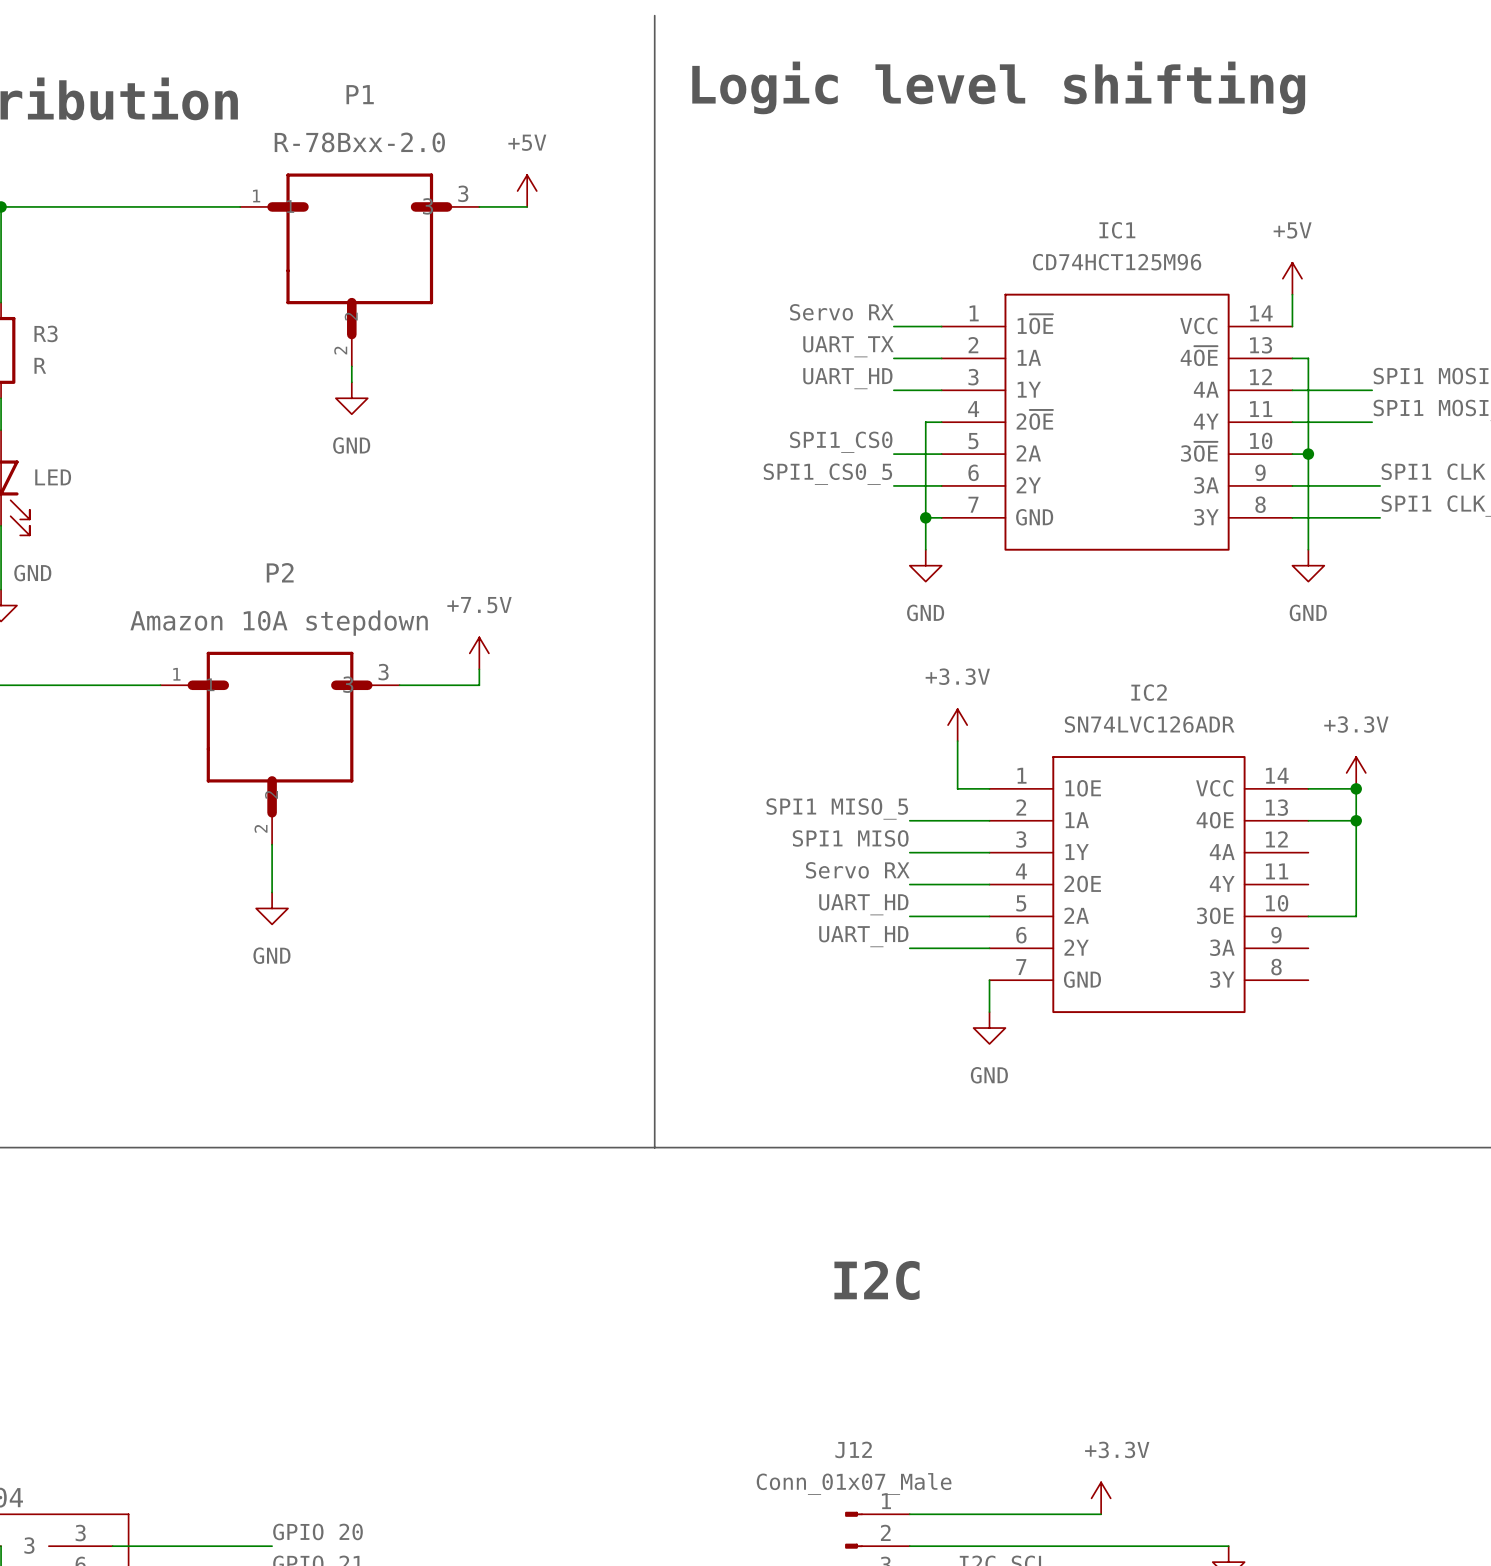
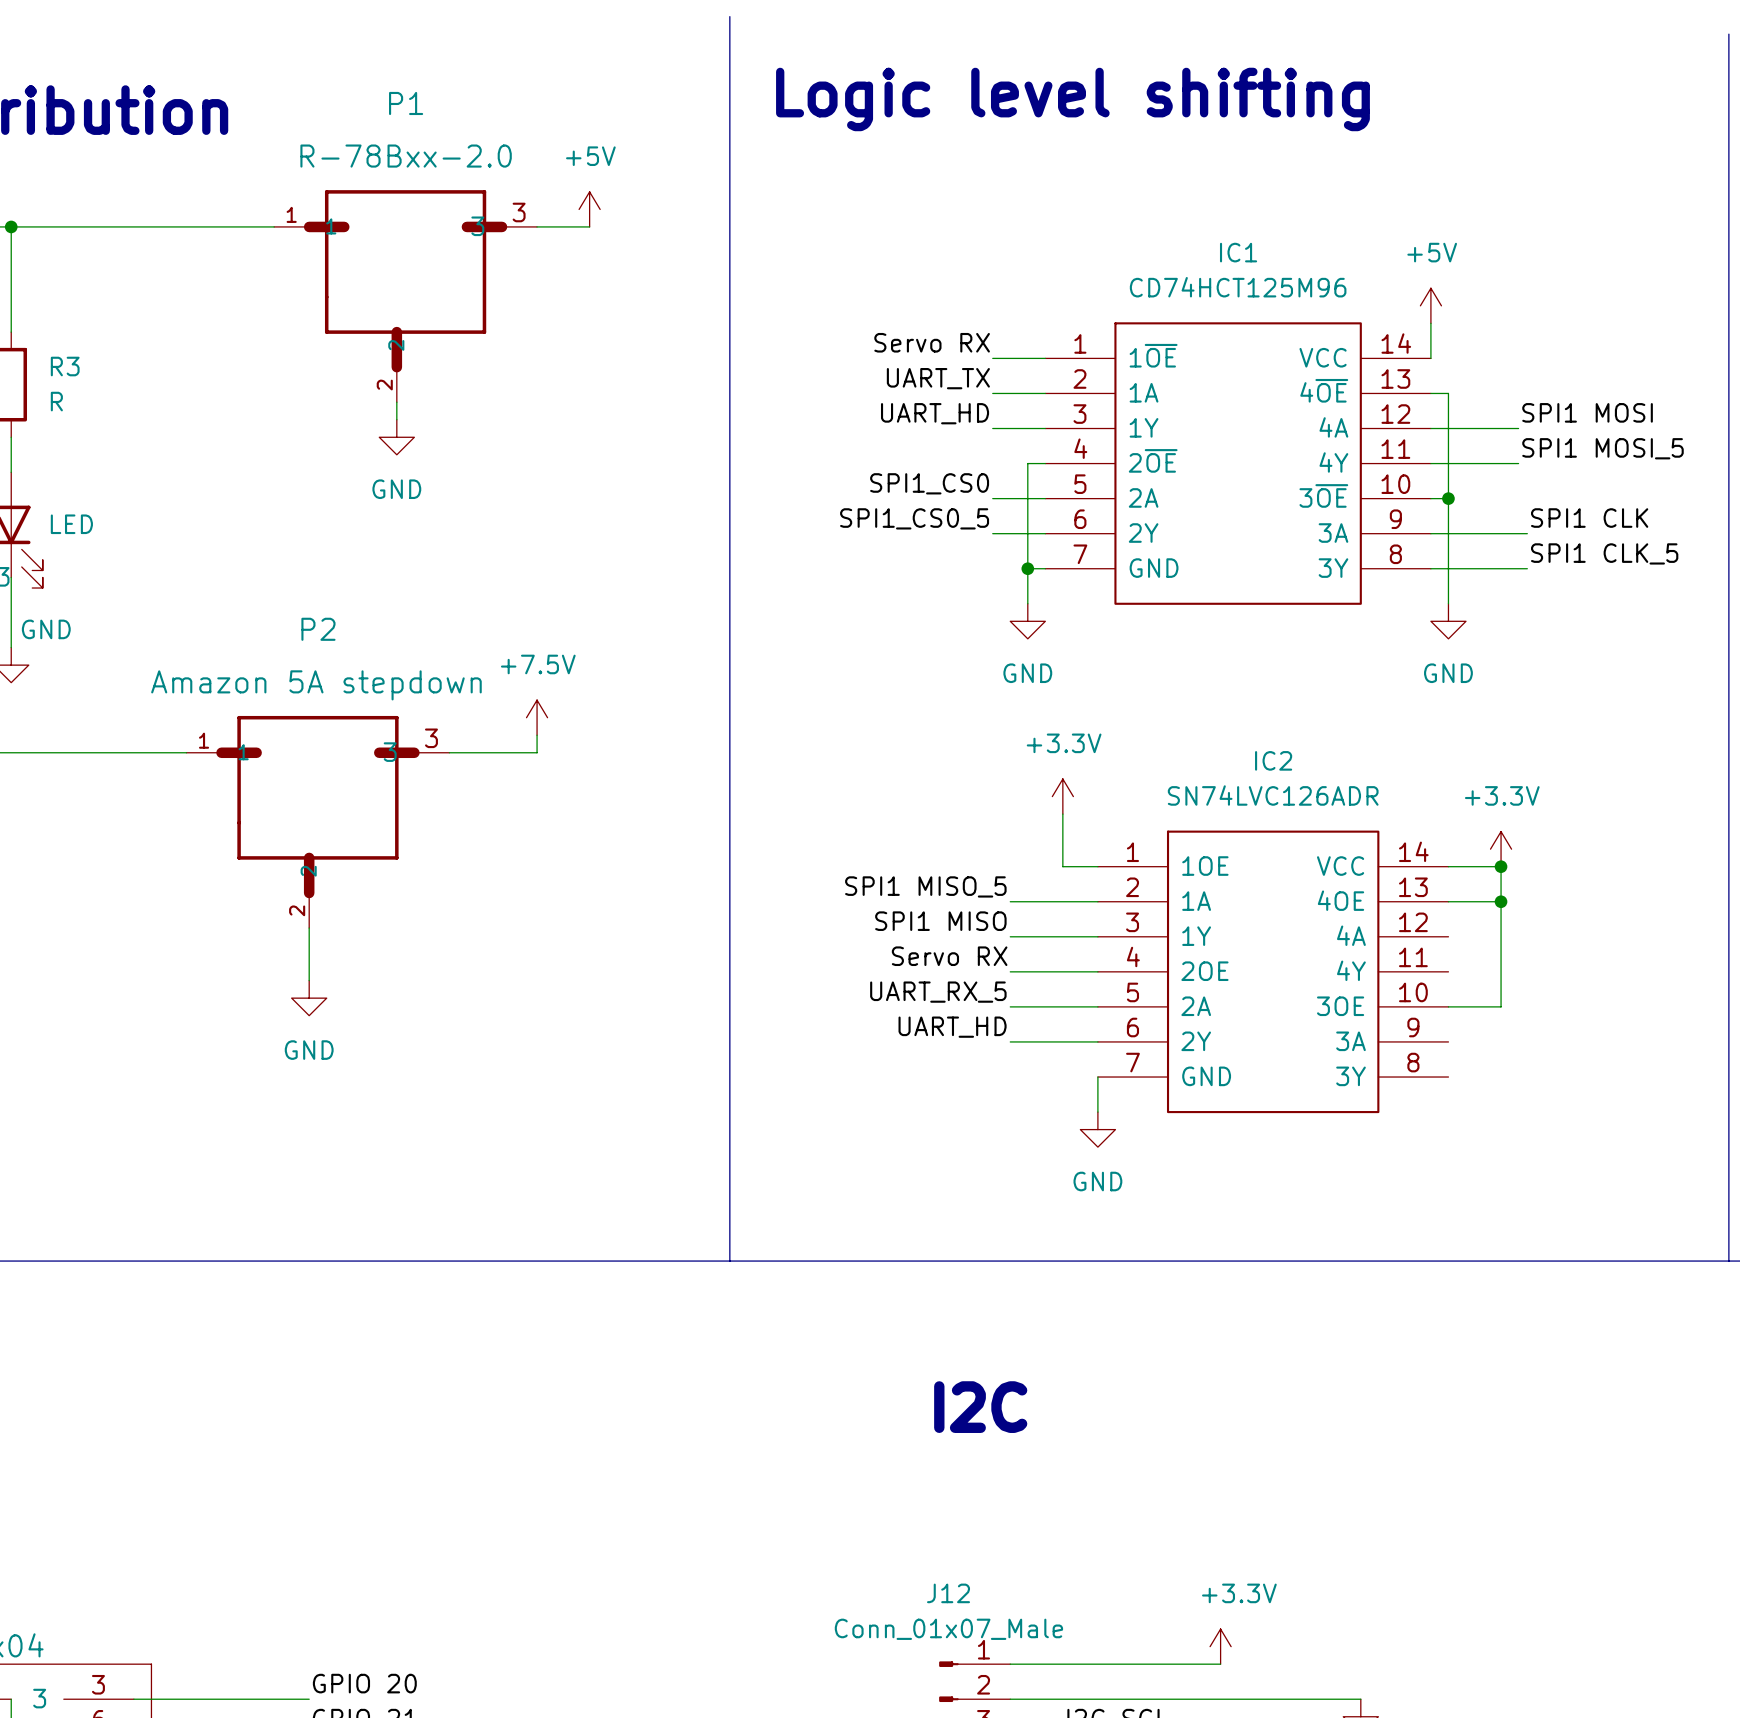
P2 value: Amazon 10A stepdown (279, 623) -> Amazon 5A stepdown (316, 685)
label: UART_HD (863, 904) -> UART_RX_5 (938, 992)

